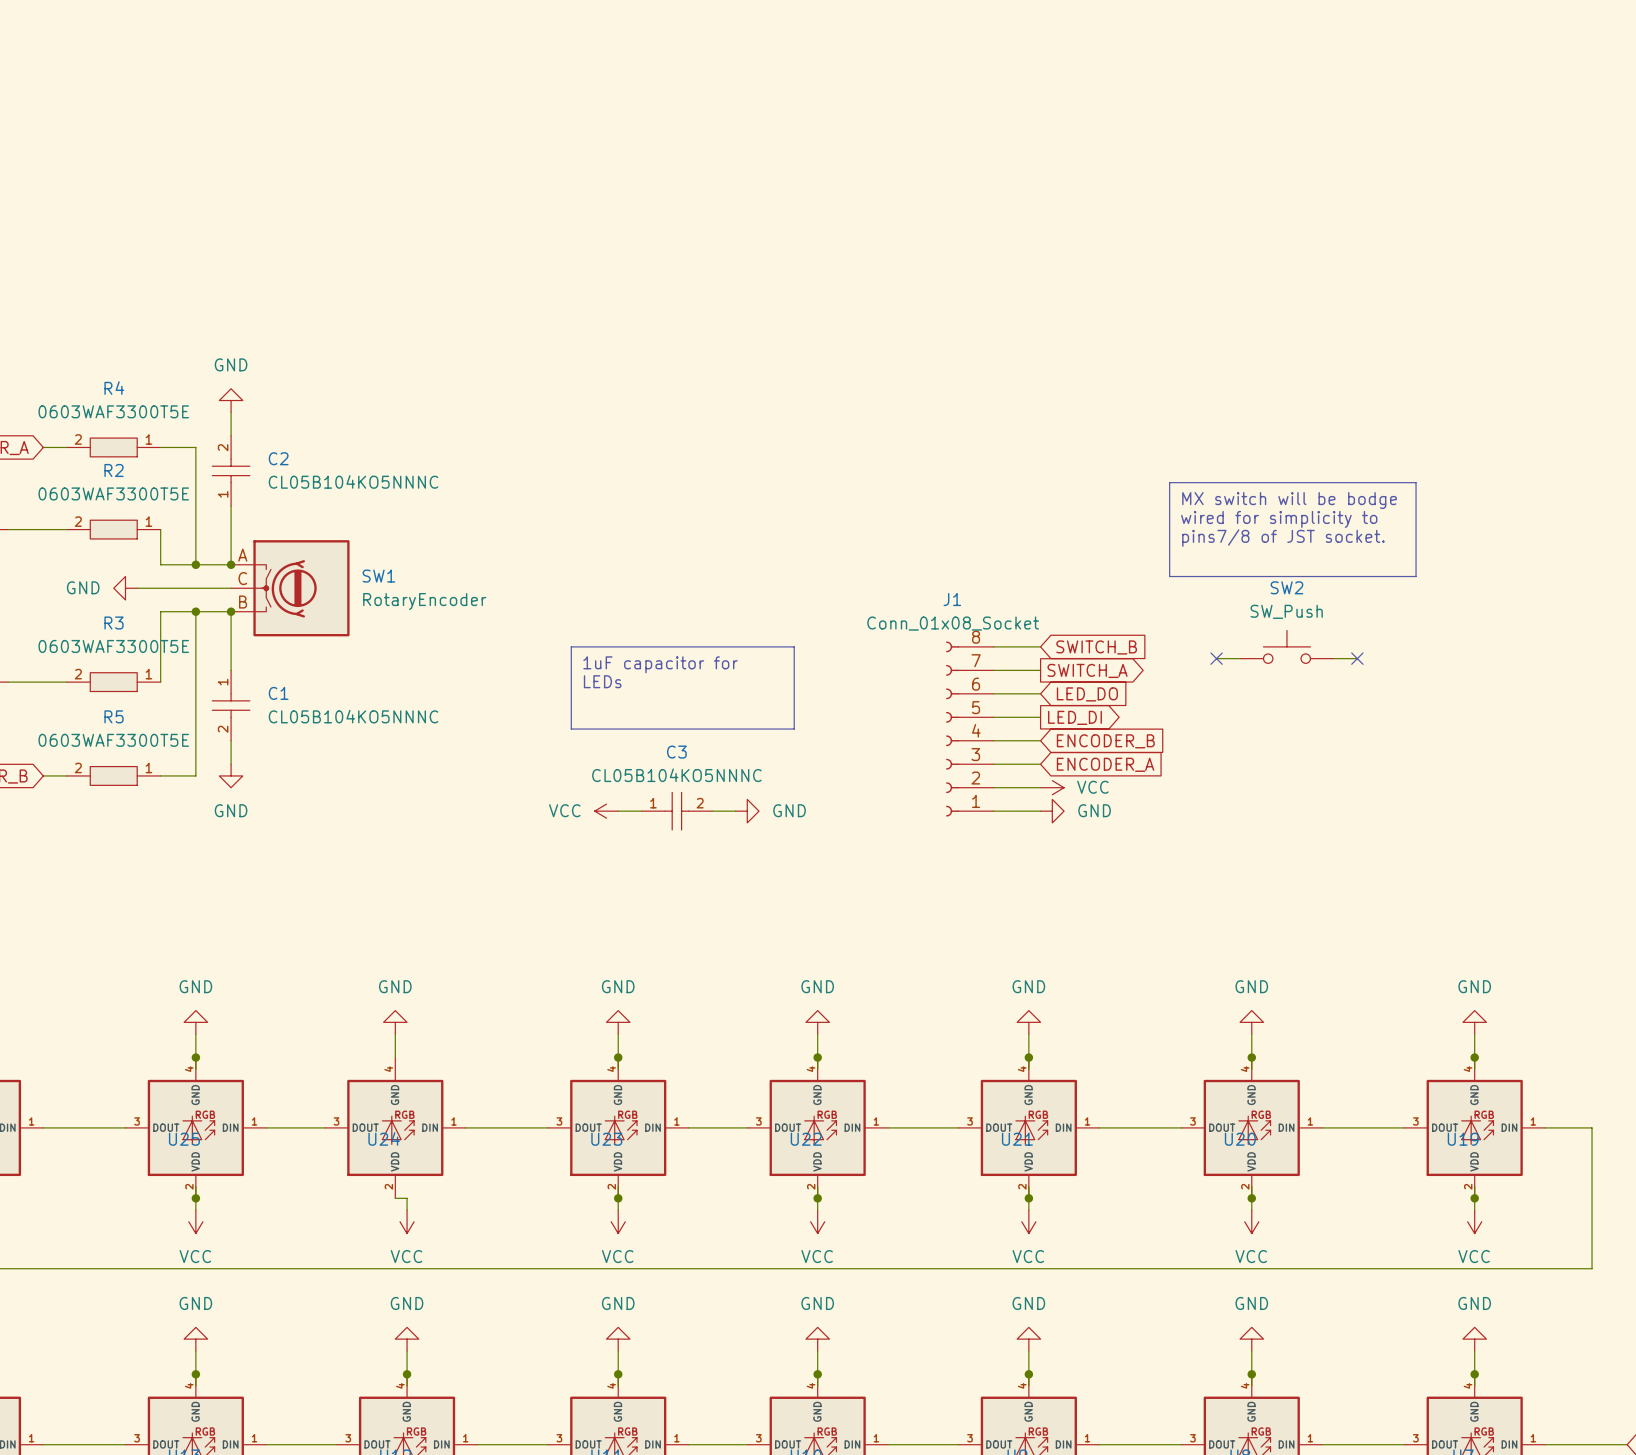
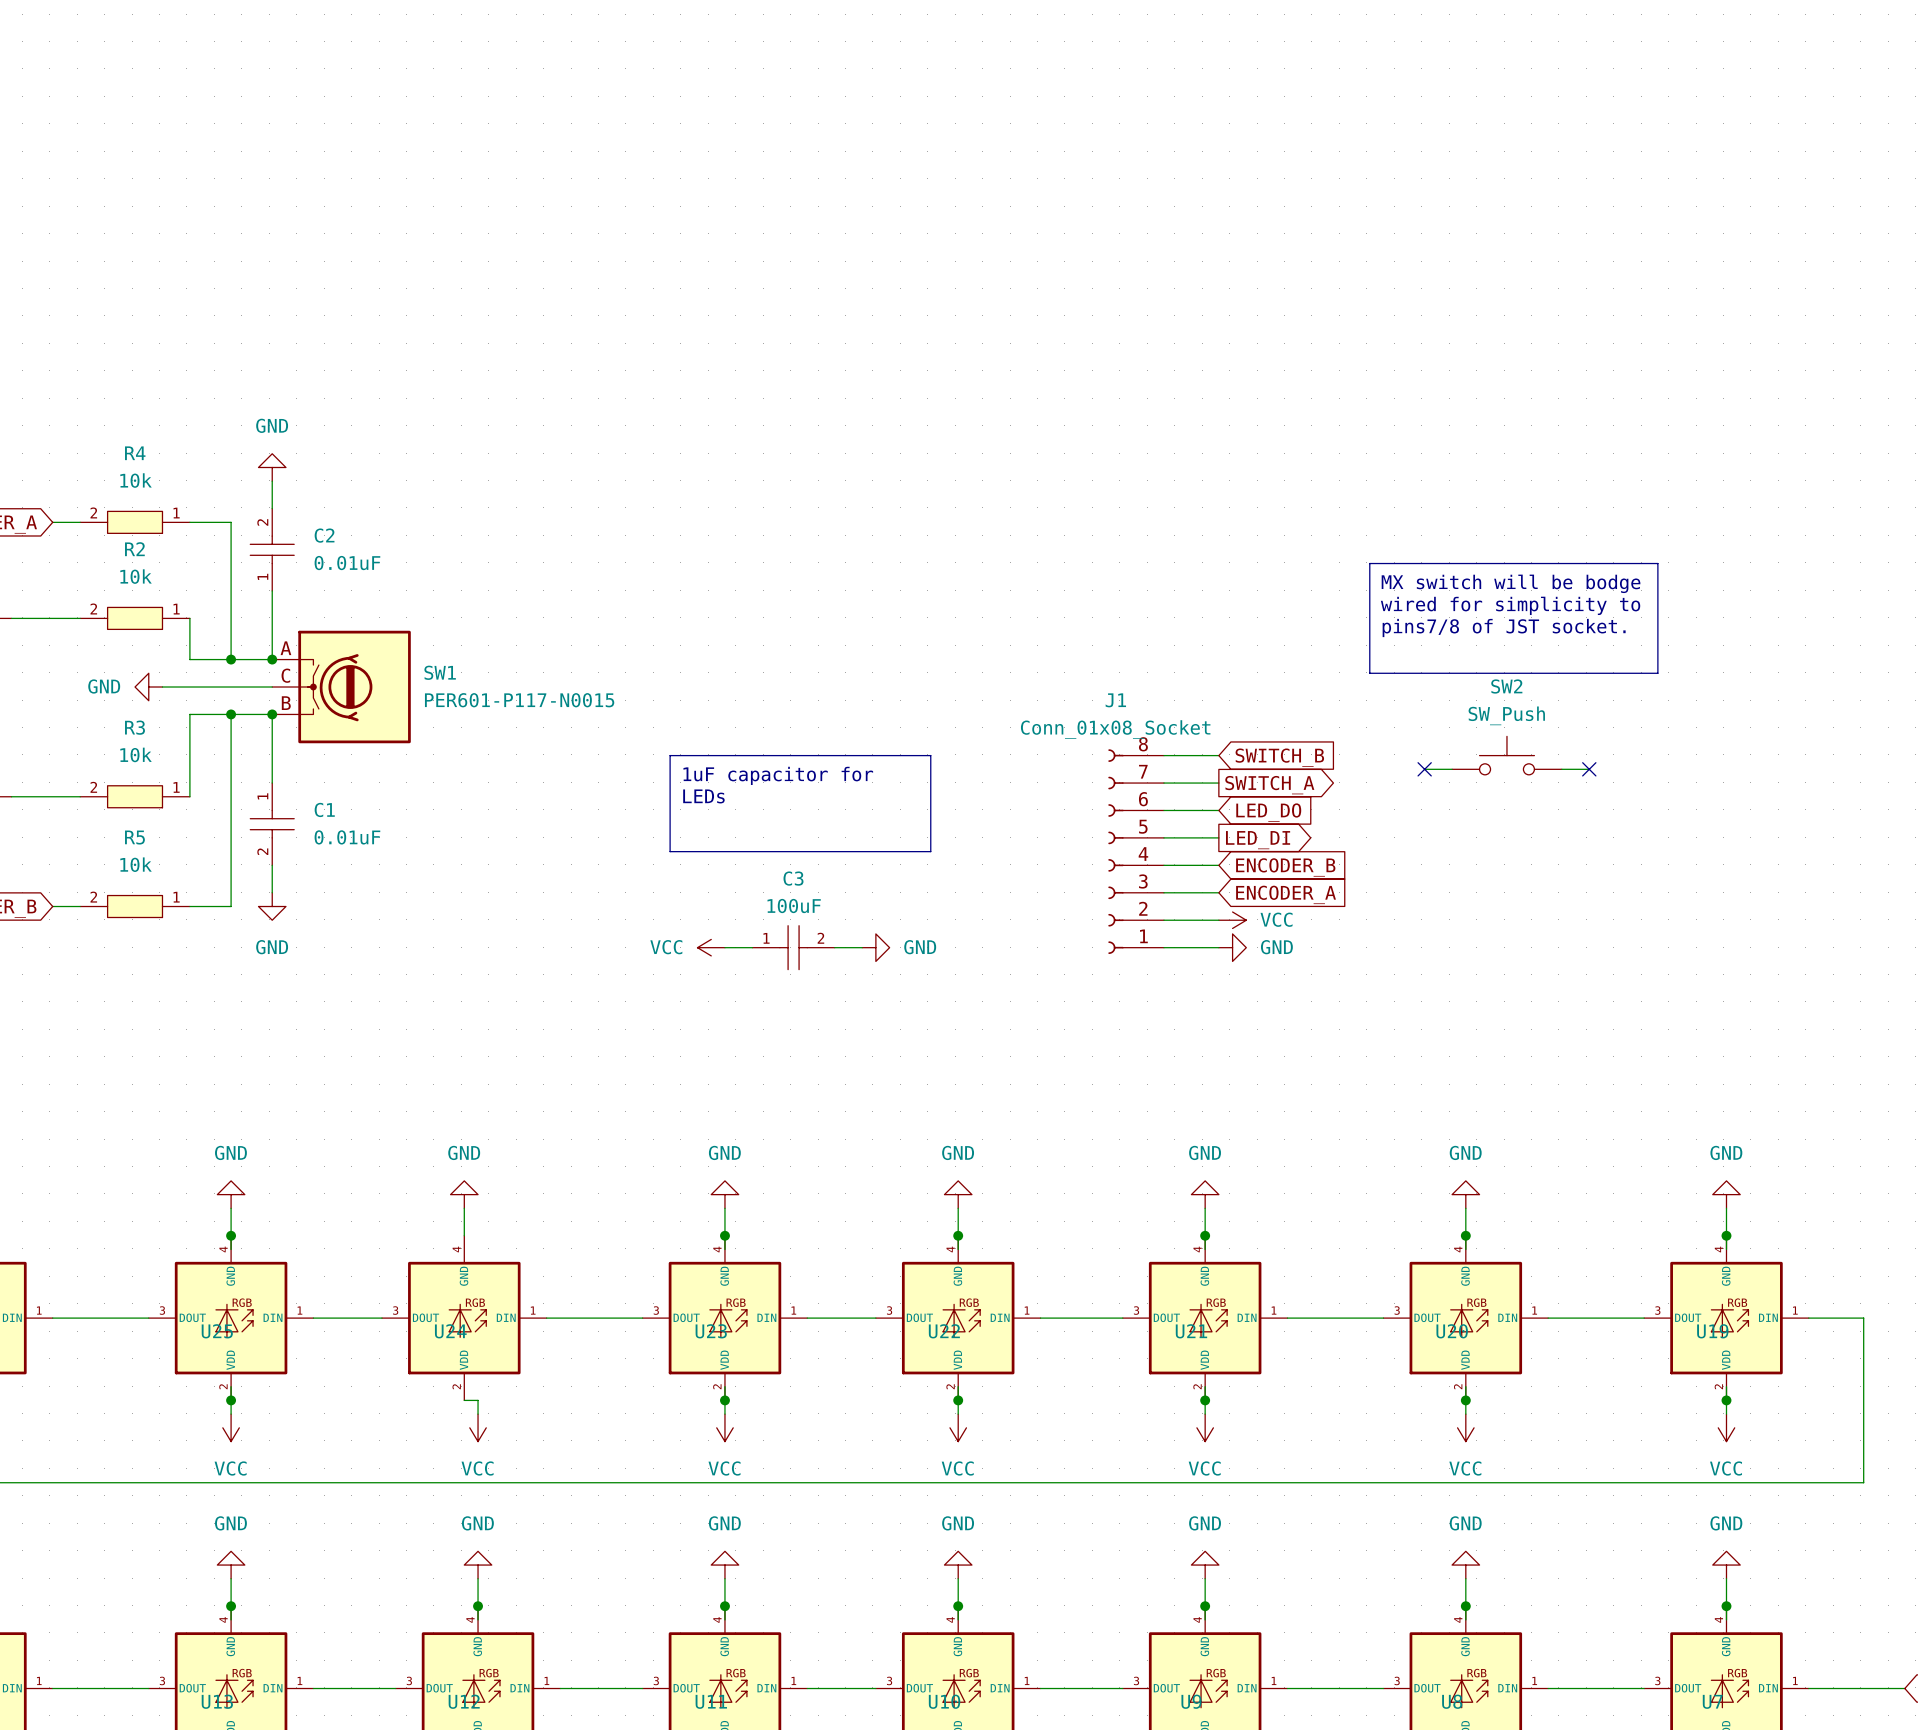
R4 value: 0603WAF3300T5E (113, 411) -> 10k (136, 480)
C2 value: CL05B104KO5NNNC (353, 481) -> 0.01uF (347, 563)
R2 value: 0603WAF3300T5E (113, 493) -> 10k (136, 576)
SW1 value: RotaryEncoder (424, 601) -> PER601-P117-N0015 (519, 700)
R3 value: 0603WAF3300T5E (113, 646) -> 10k (136, 754)
C1 value: CL05B104KO5NNNC (353, 716) -> 0.01uF (347, 837)
R5 value: 0603WAF3300T5E (113, 740) -> 10k (136, 864)
C3 value: CL05B104KO5NNNC (676, 775) -> 100uF (794, 906)

